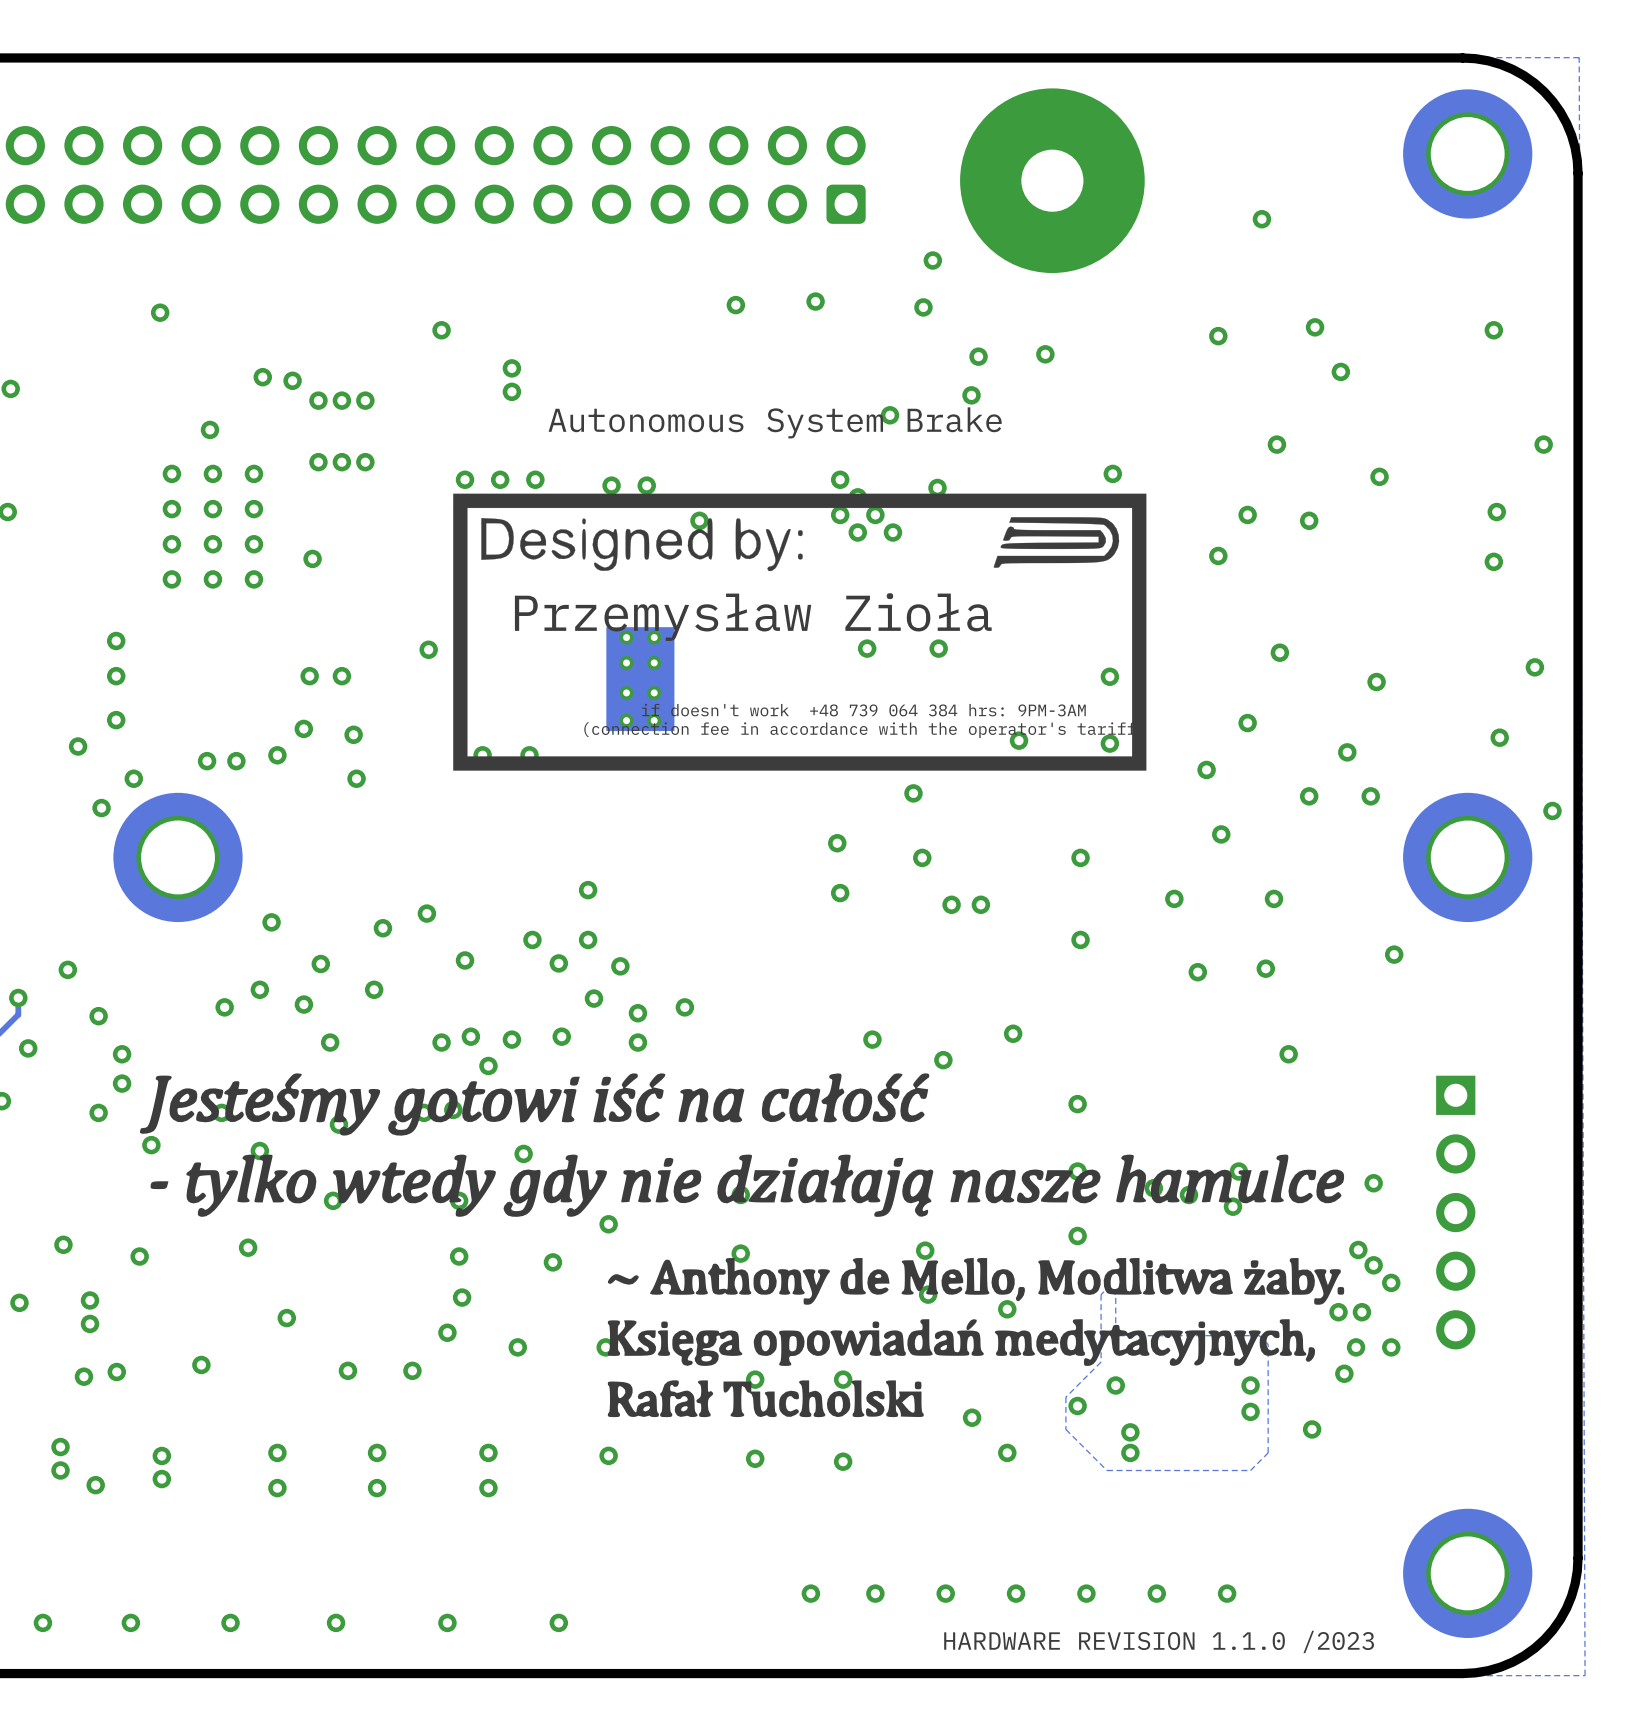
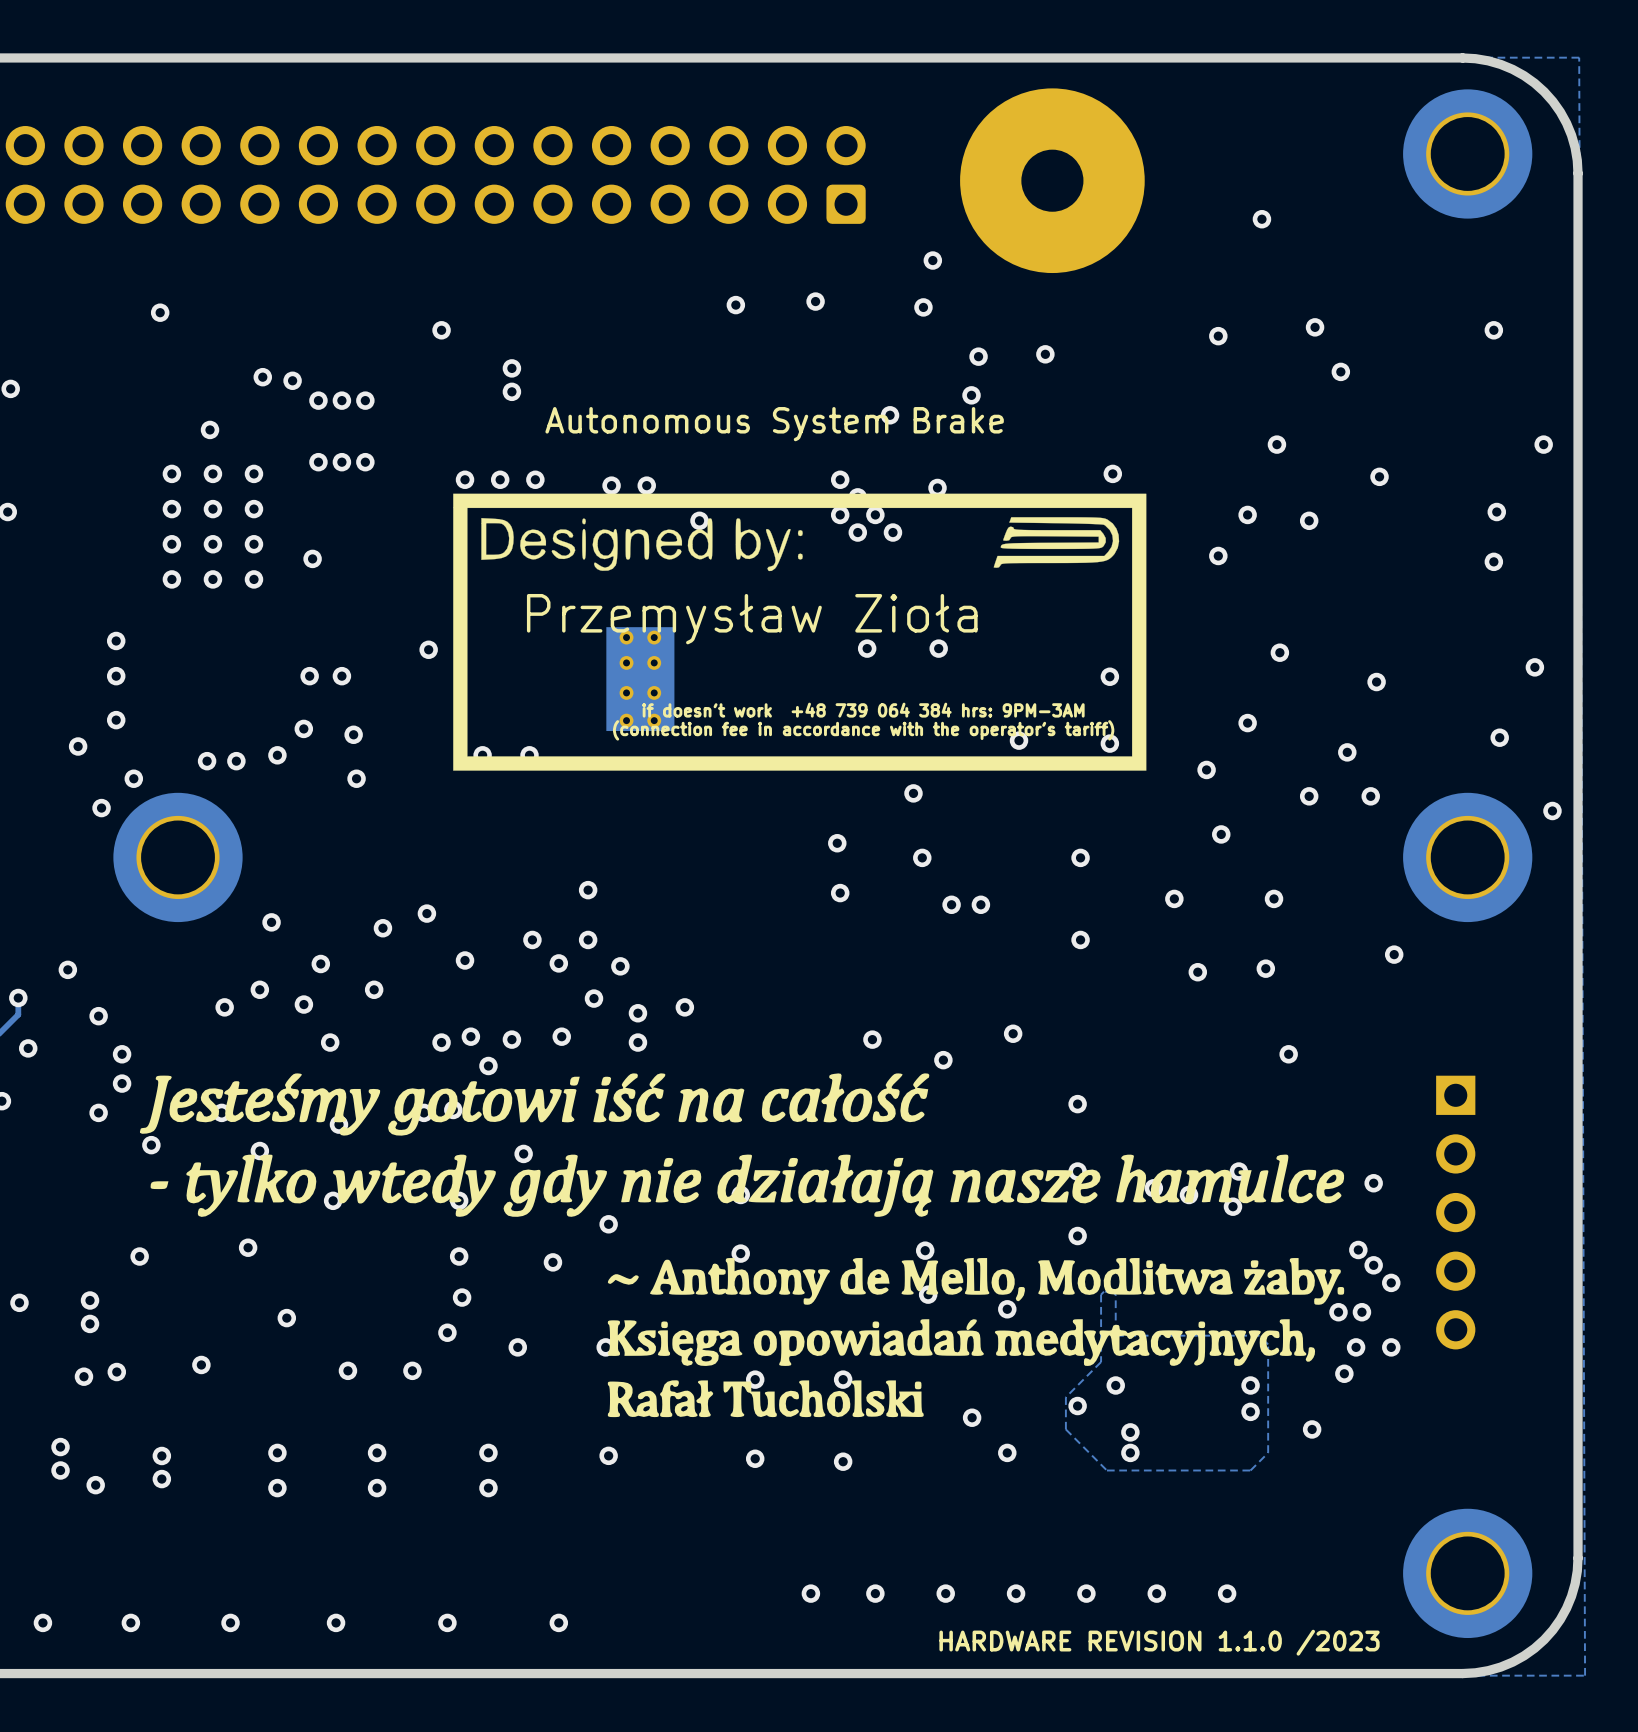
via: (63, 1244) -> none

